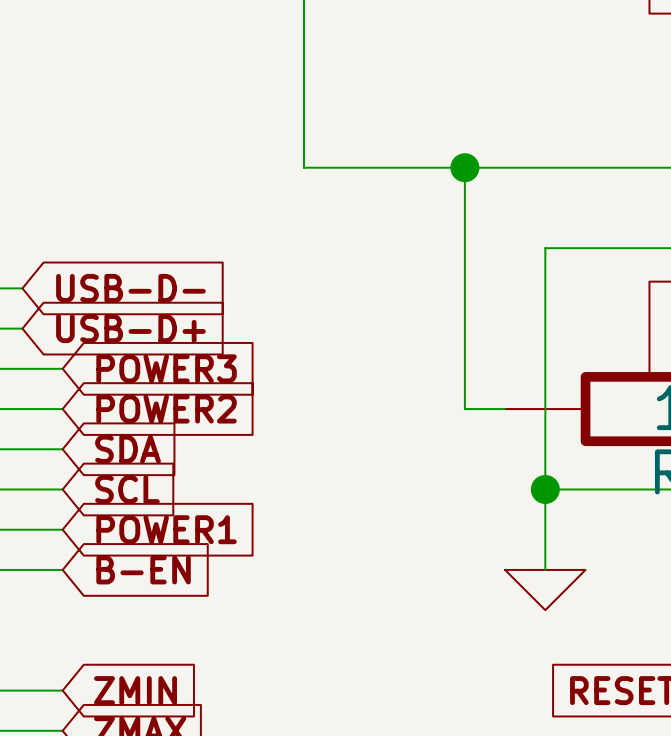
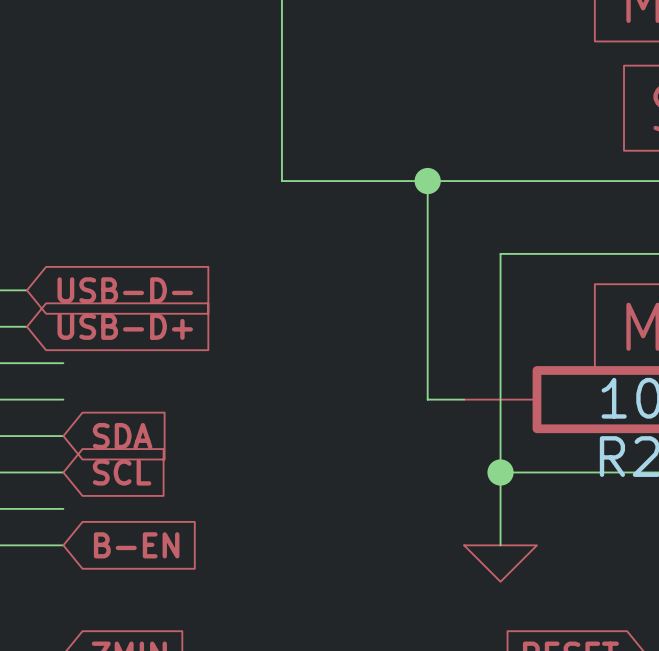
global label: POWER3 (166, 368) -> none
global label: POWER2 (166, 409) -> none
global label: POWER1 (166, 529) -> none

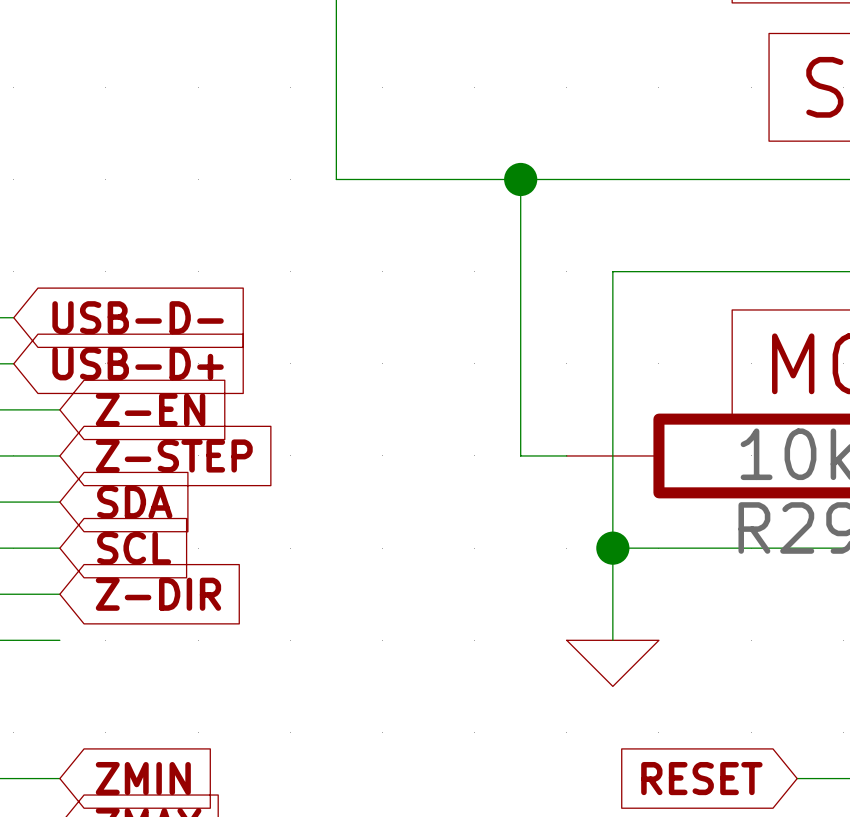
global label: none -> Z-EN (150, 409)
global label: none -> Z-STEP (174, 455)
global label: none -> Z-DIR (158, 594)
global label: B-EN (136, 545) -> none

